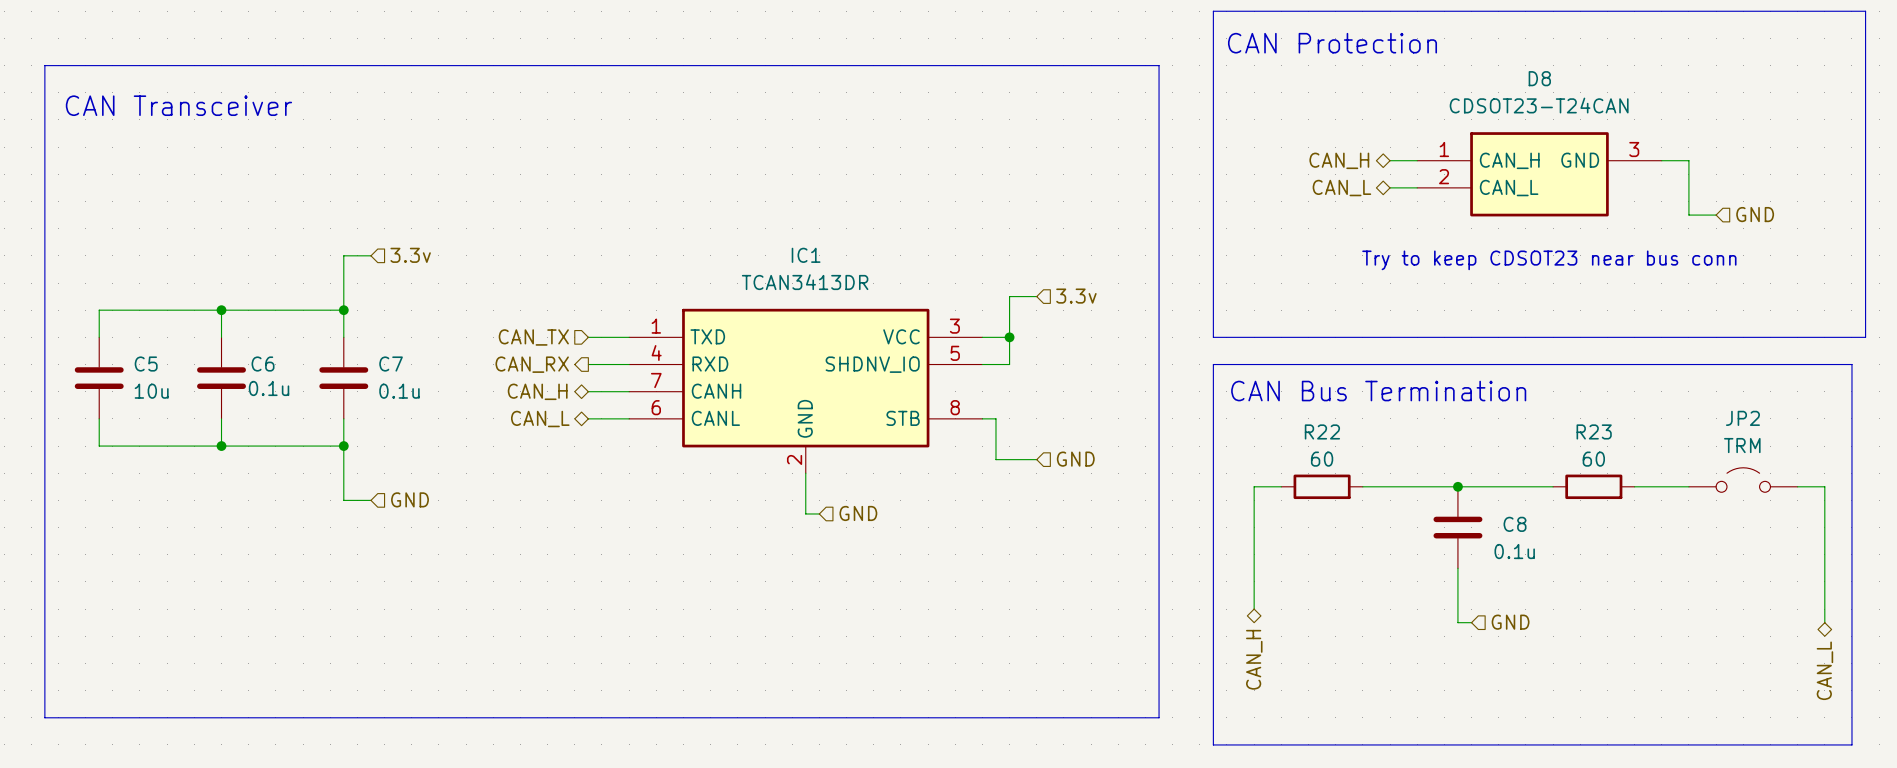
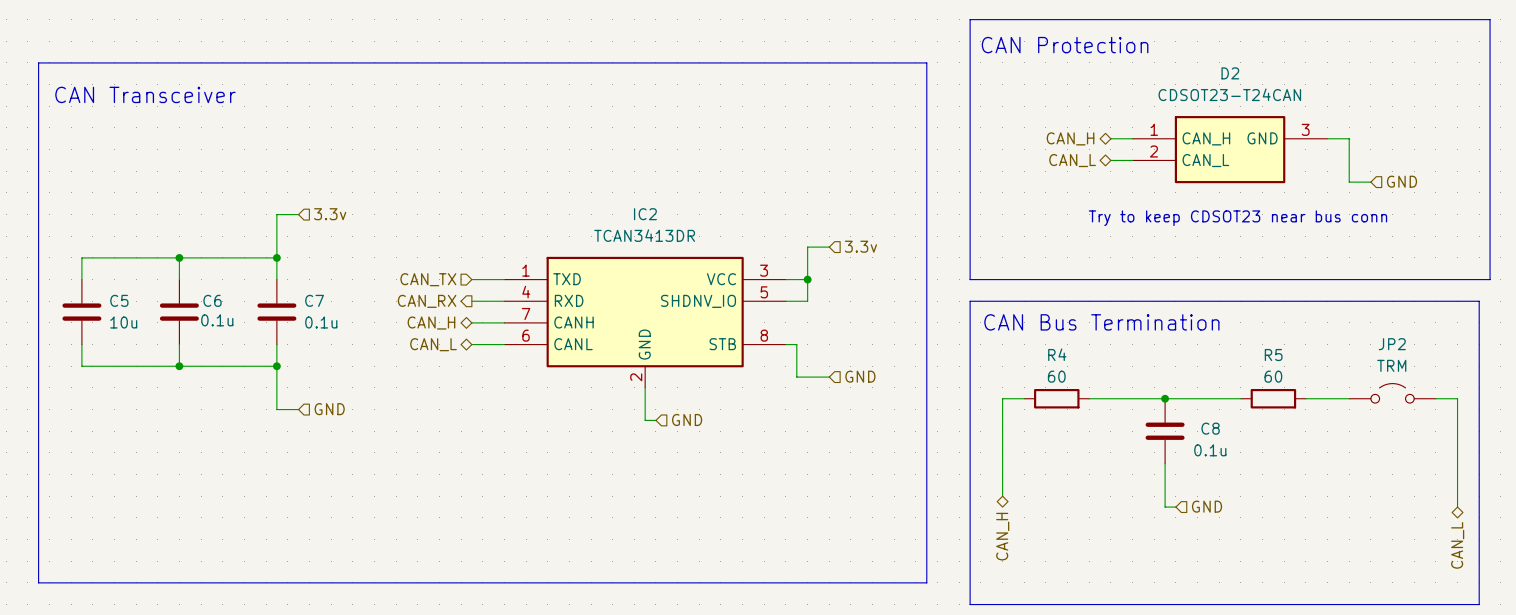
D8 name: D8 (1539, 78) -> D2 (1230, 73)
IC1 name: IC1 (806, 255) -> IC2 (645, 214)
R22 name: R22 (1322, 431) -> R4 (1057, 354)
R23 name: R23 (1594, 431) -> R5 (1273, 355)

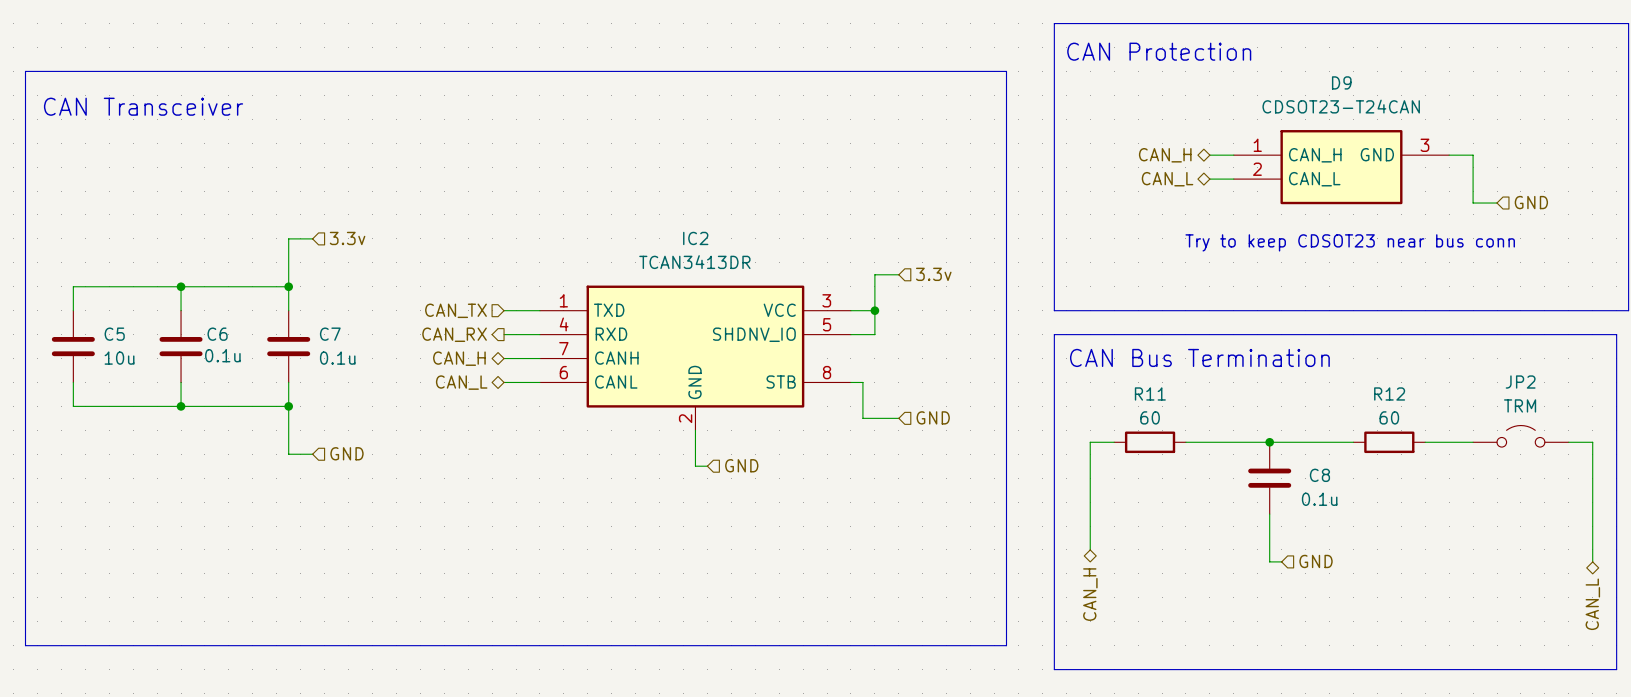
D2 name: D2 (1230, 73) -> D9 (1341, 82)
R4 name: R4 (1057, 354) -> R11 (1150, 393)
R5 name: R5 (1273, 355) -> R12 (1389, 393)

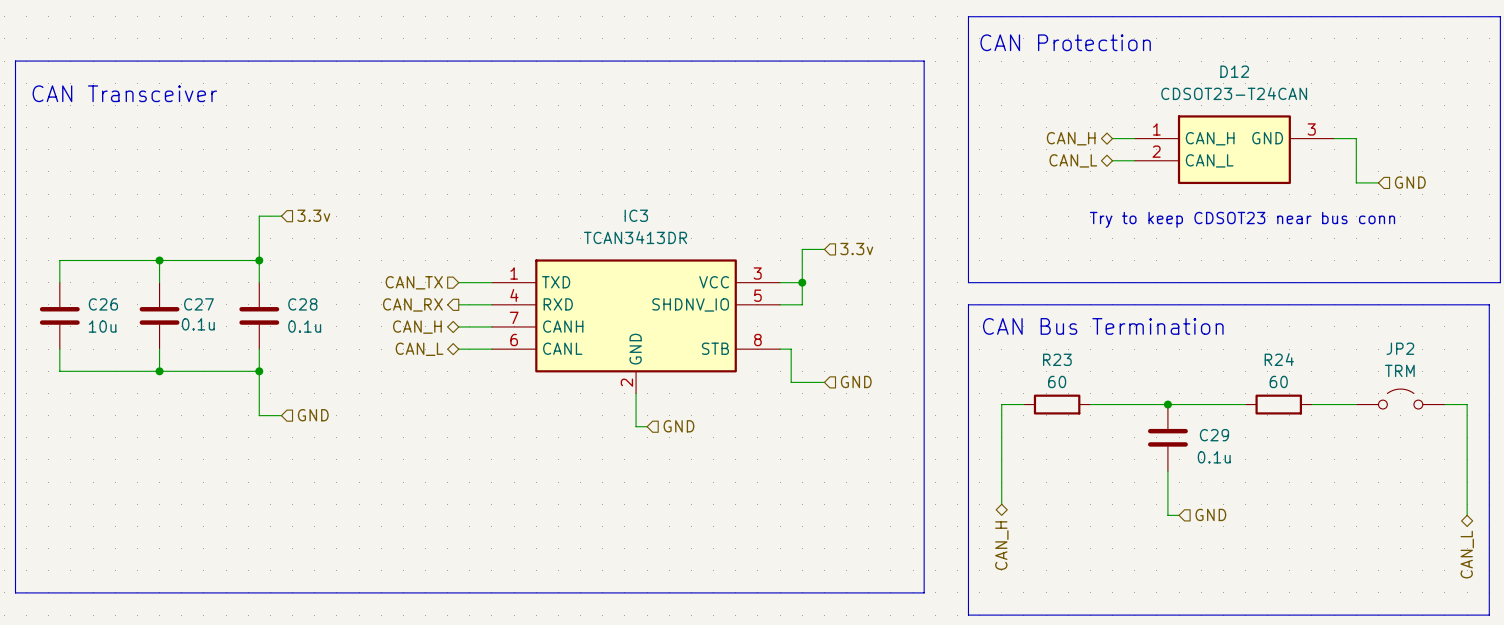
D9 name: D9 (1341, 82) -> D12 (1234, 71)
IC2 name: IC2 (695, 238) -> IC3 (636, 215)
C5 name: C5 (114, 334) -> C26 (103, 304)
C6 name: C6 (217, 334) -> C27 (198, 304)
C7 name: C7 (330, 334) -> C28 (302, 304)
R11 name: R11 (1150, 393) -> R23 (1057, 359)
R12 name: R12 (1389, 393) -> R24 (1279, 359)
C8 name: C8 (1319, 475) -> C29 (1214, 435)

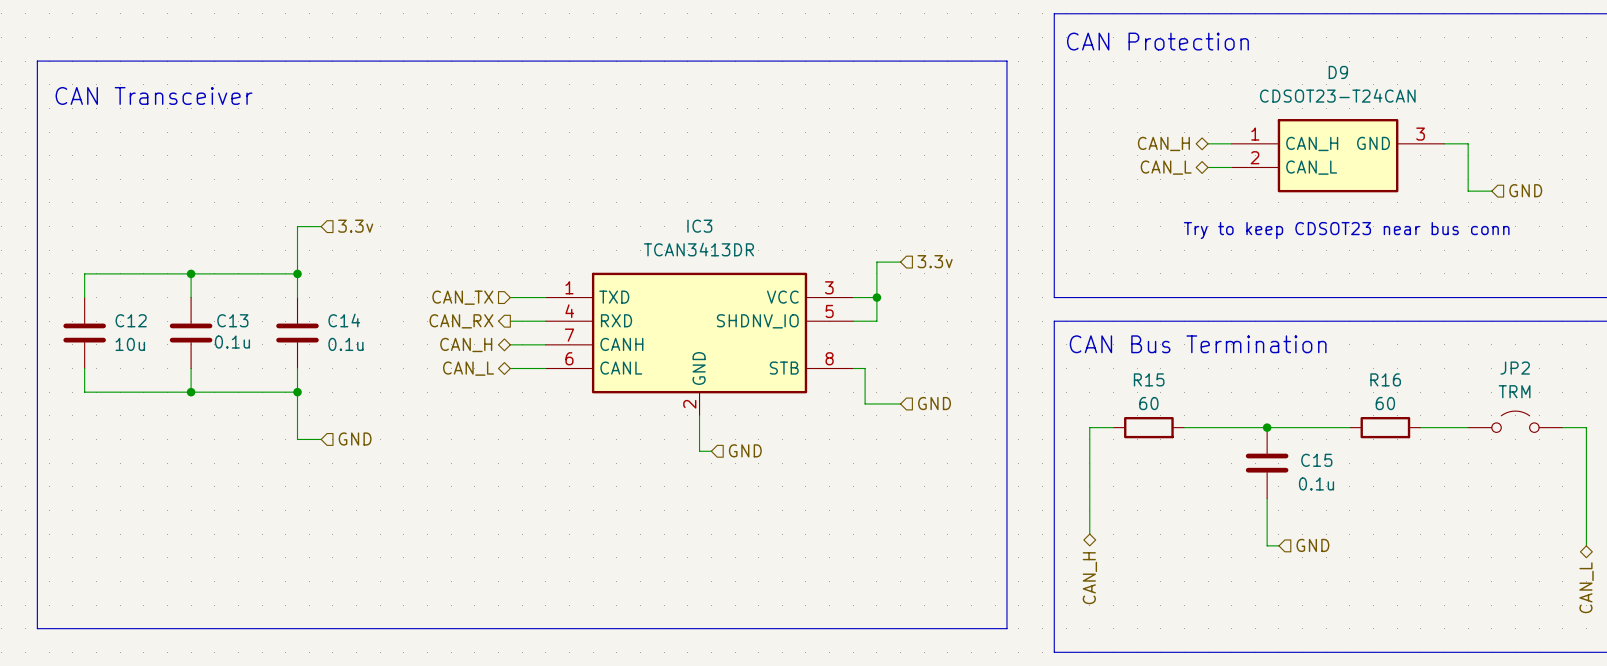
D12 name: D12 (1234, 71) -> D9 (1338, 72)
C26 name: C26 (103, 304) -> C12 (131, 320)
C27 name: C27 (198, 304) -> C13 (232, 320)
C28 name: C28 (302, 304) -> C14 (344, 320)
R23 name: R23 (1057, 359) -> R15 (1149, 379)
R24 name: R24 (1279, 359) -> R16 (1385, 379)
C29 name: C29 (1214, 435) -> C15 (1316, 460)

